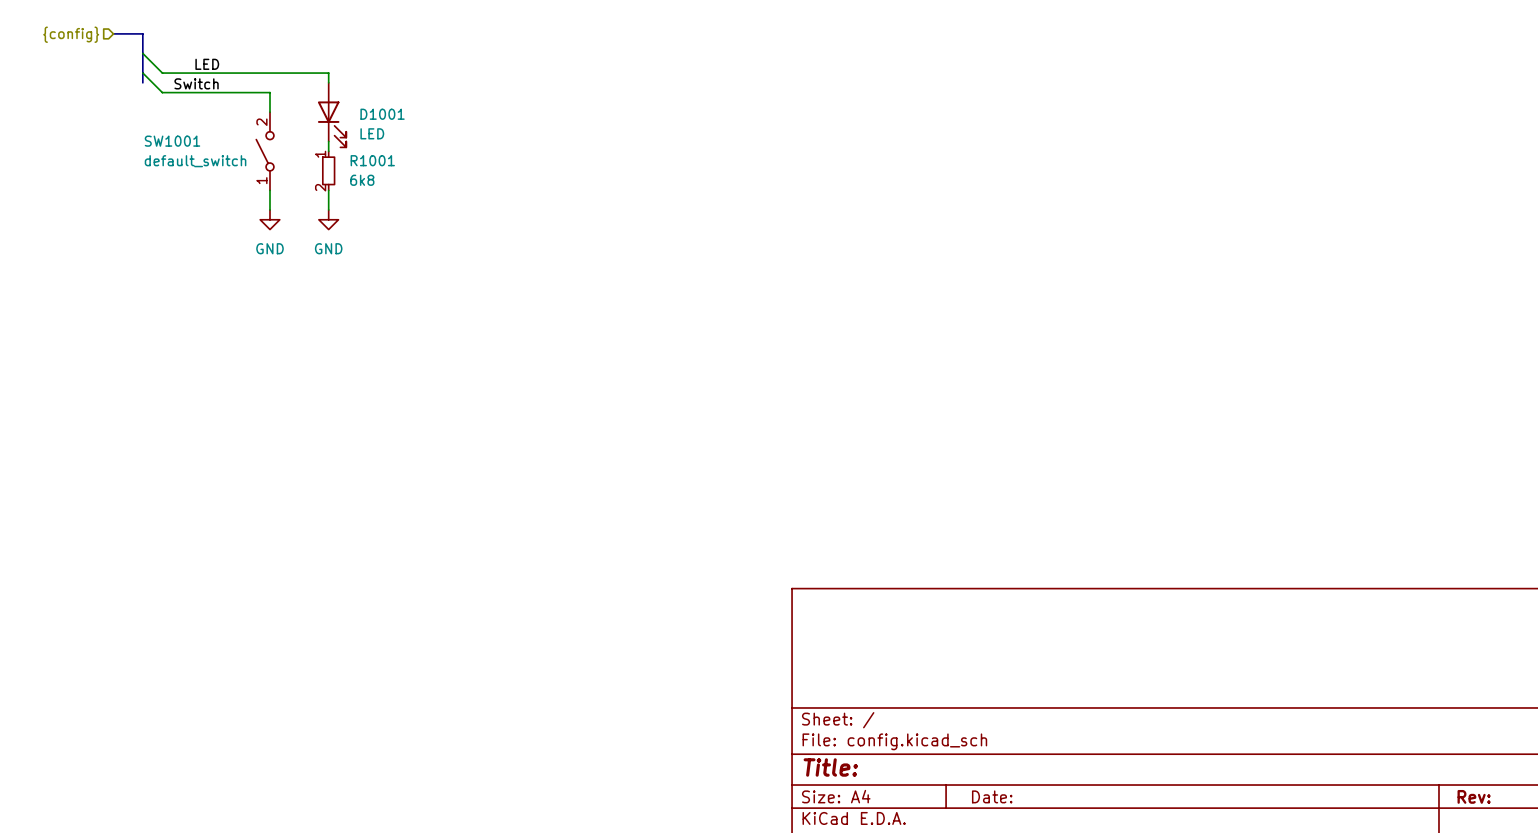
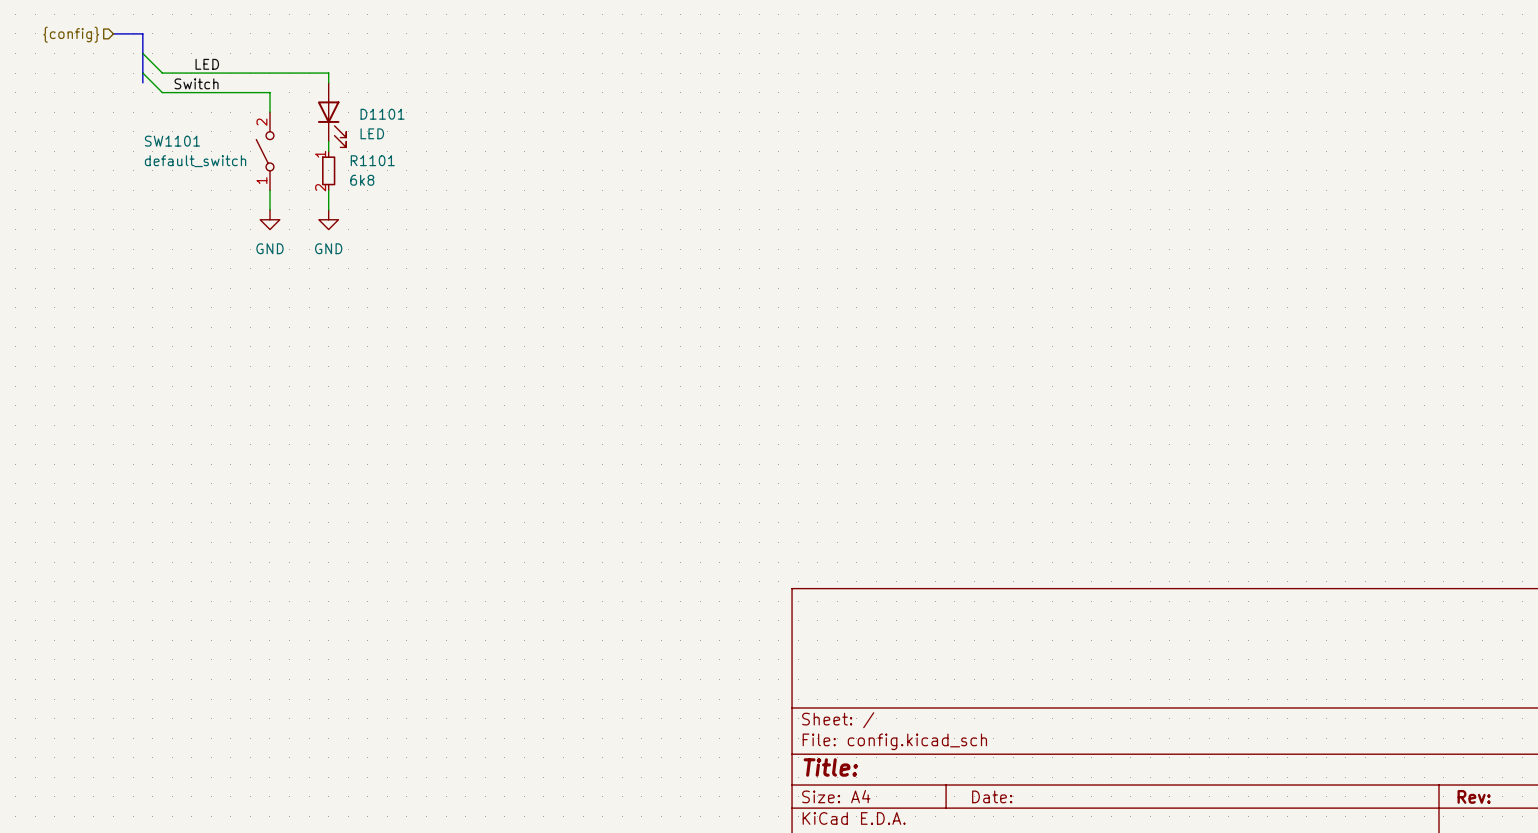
D1001 name: D1001 (382, 114) -> D1101 (382, 114)
SW1001 name: SW1001 (172, 141) -> SW1101 (172, 141)
R1001 name: R1001 (372, 160) -> R1101 (372, 160)

